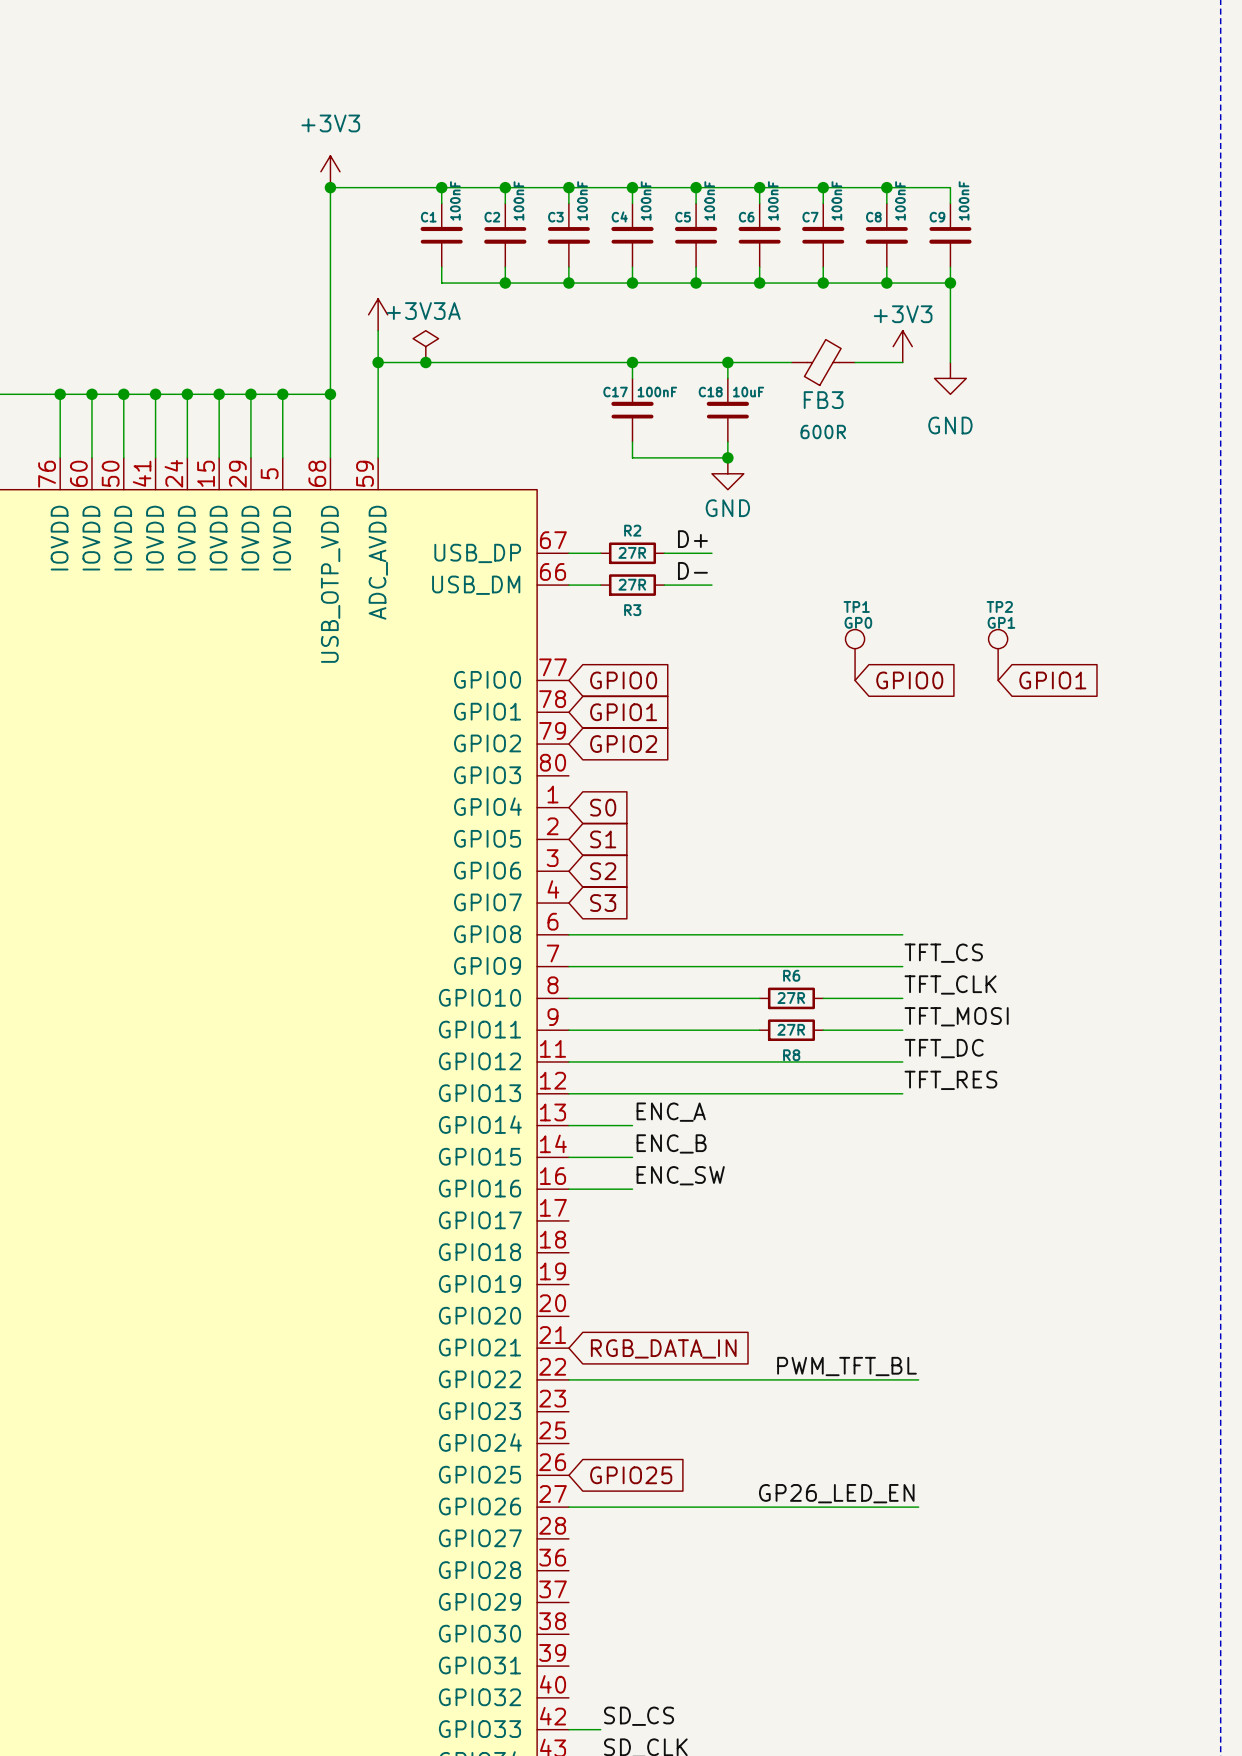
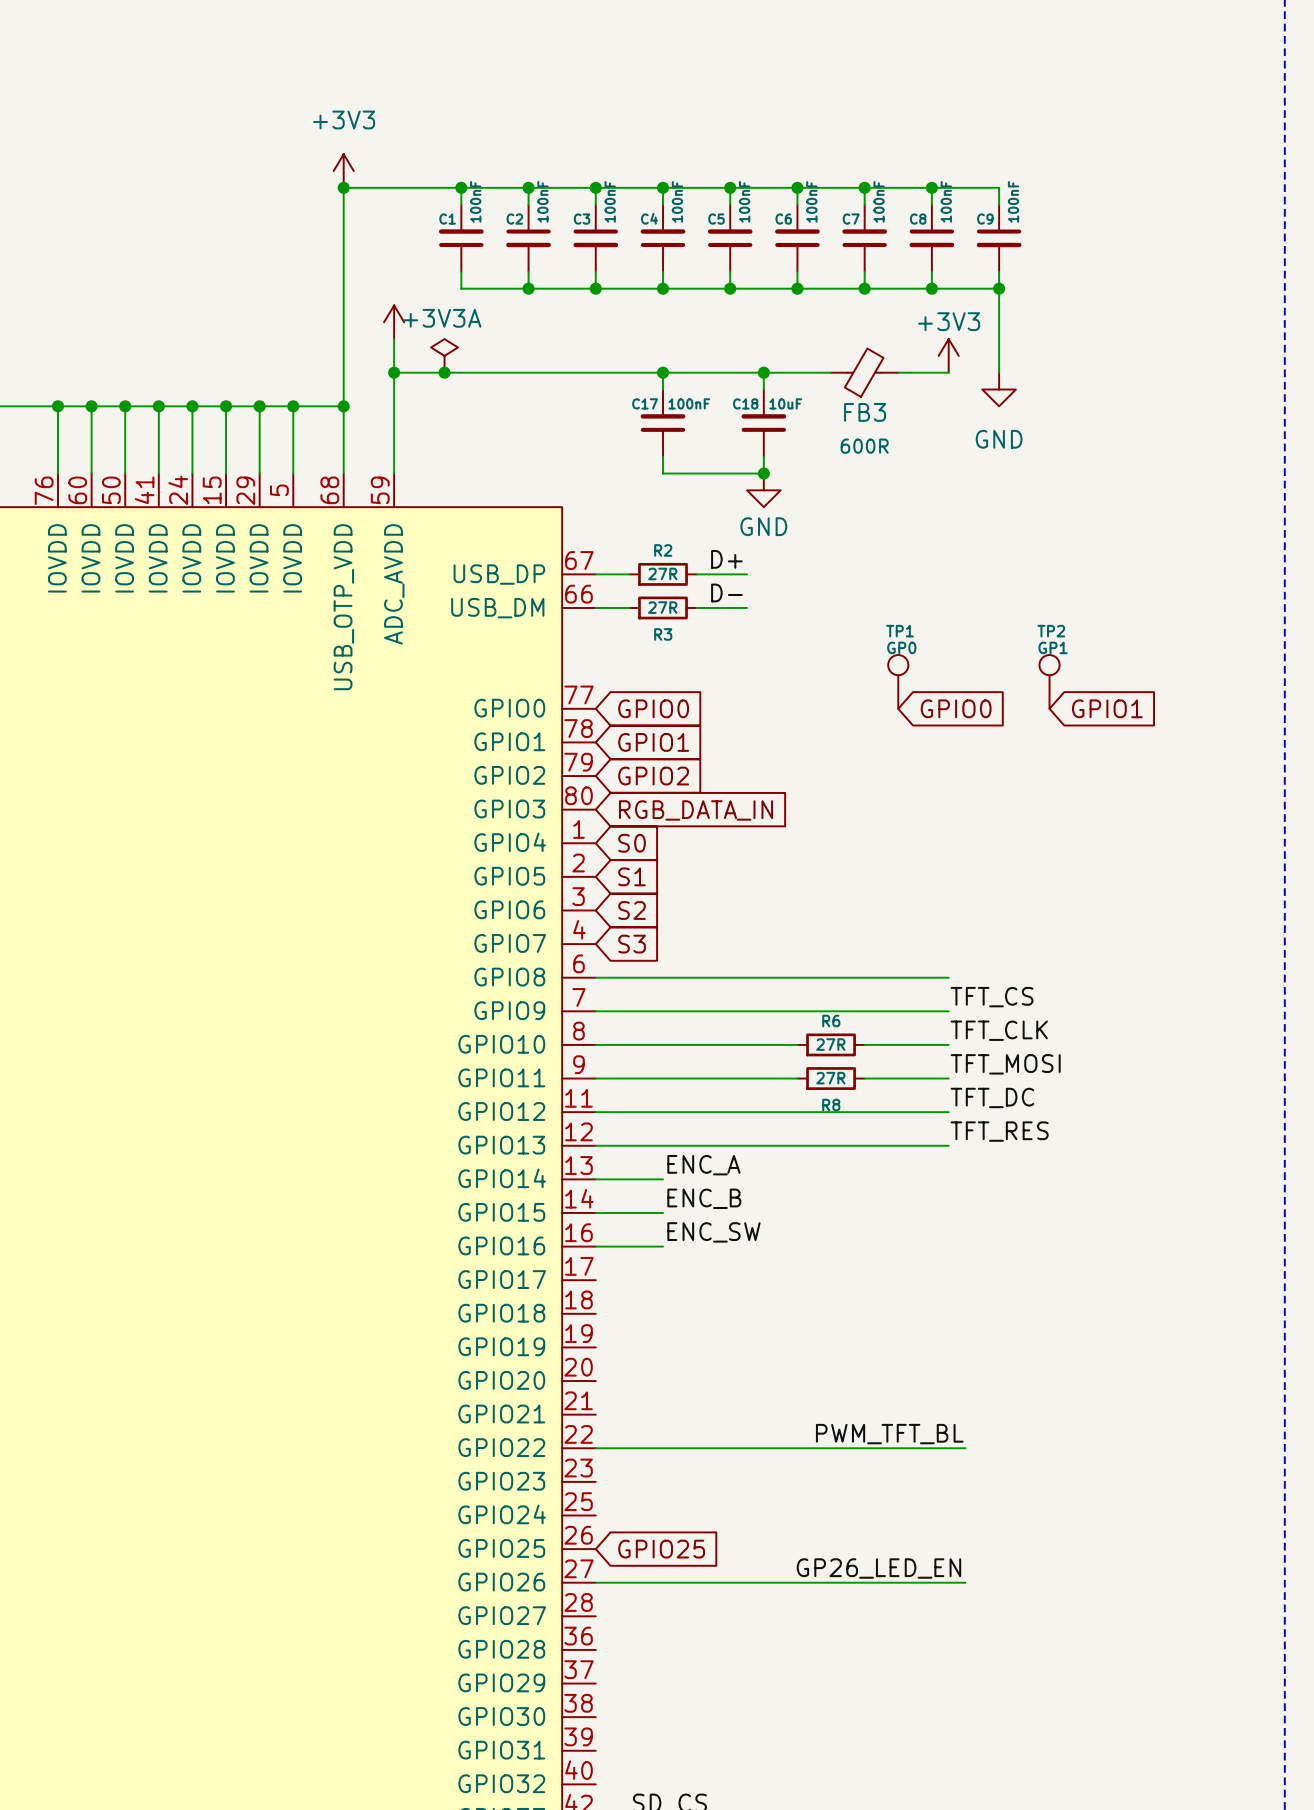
global label: none -> RGB_DATA_IN (696, 810)
global label: RGB_DATA_IN (663, 1348) -> none

